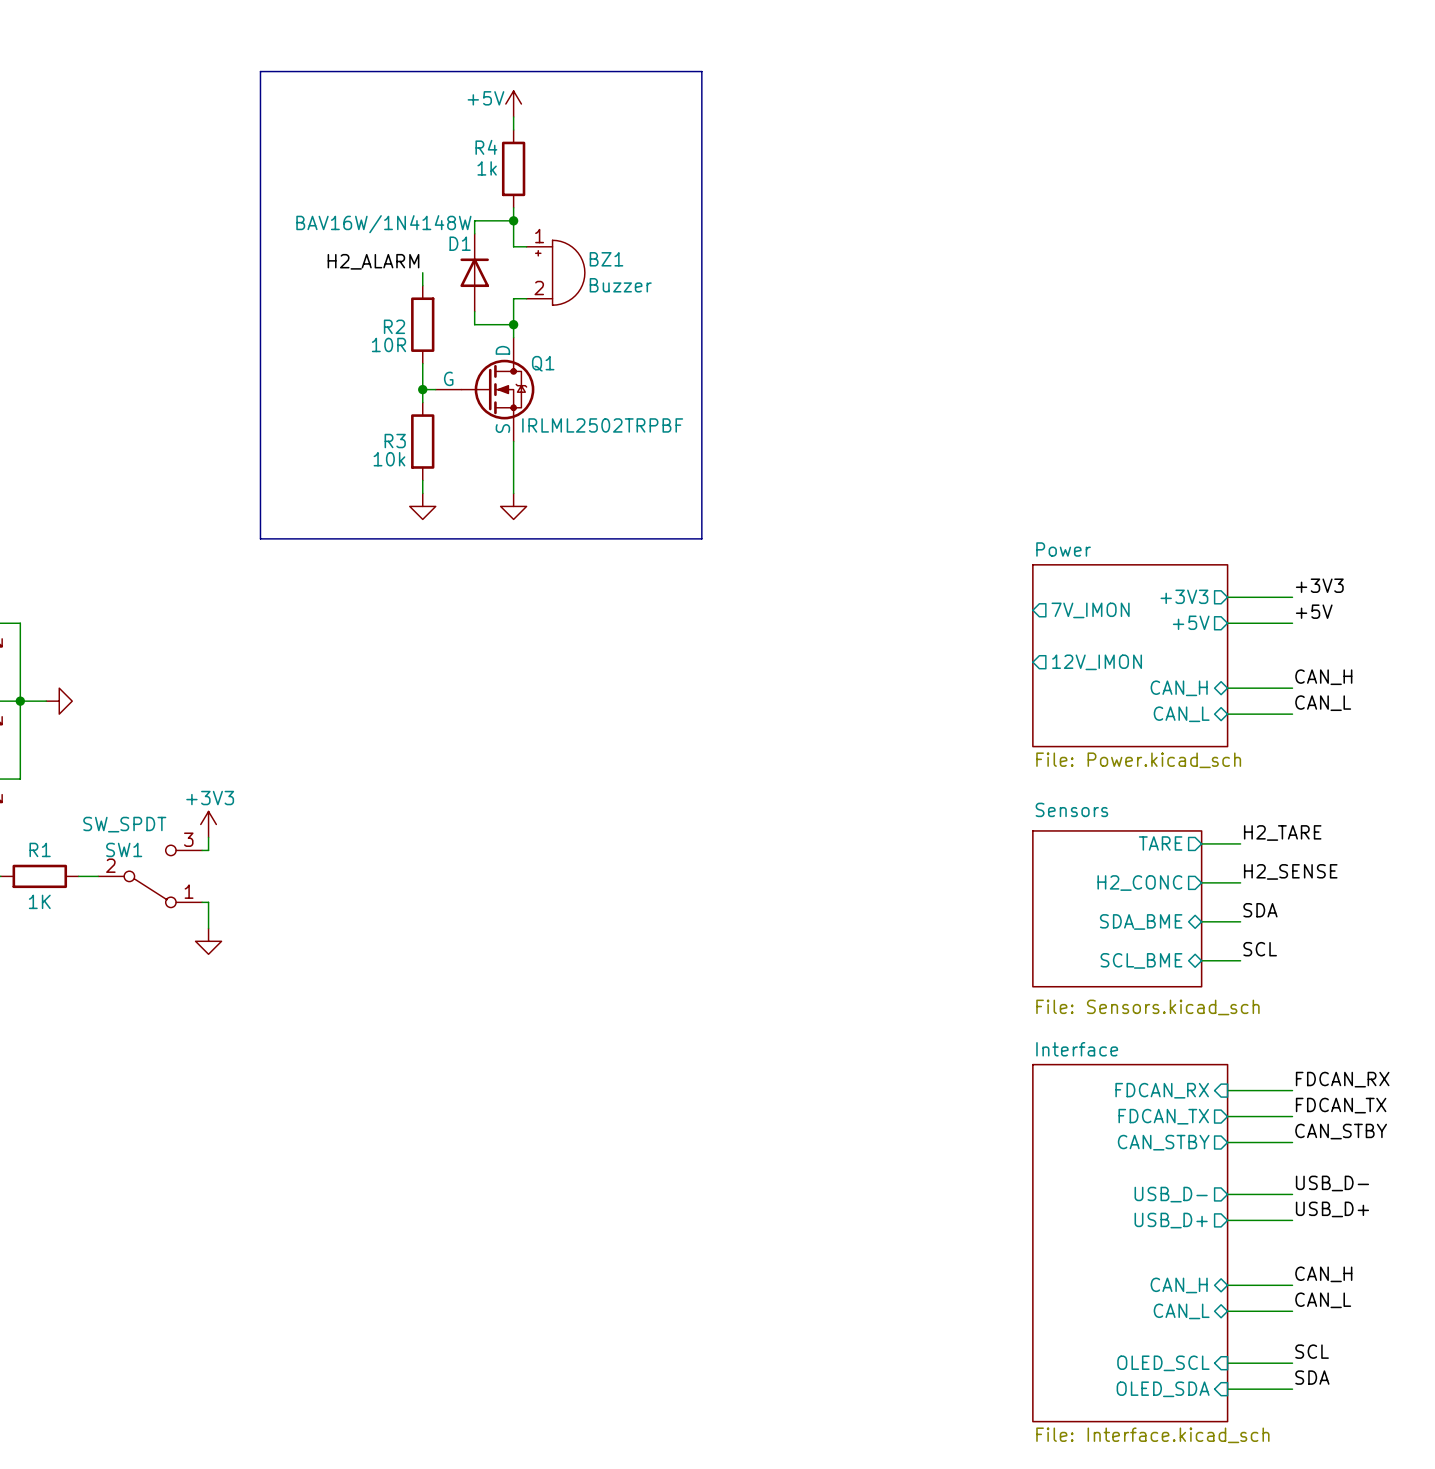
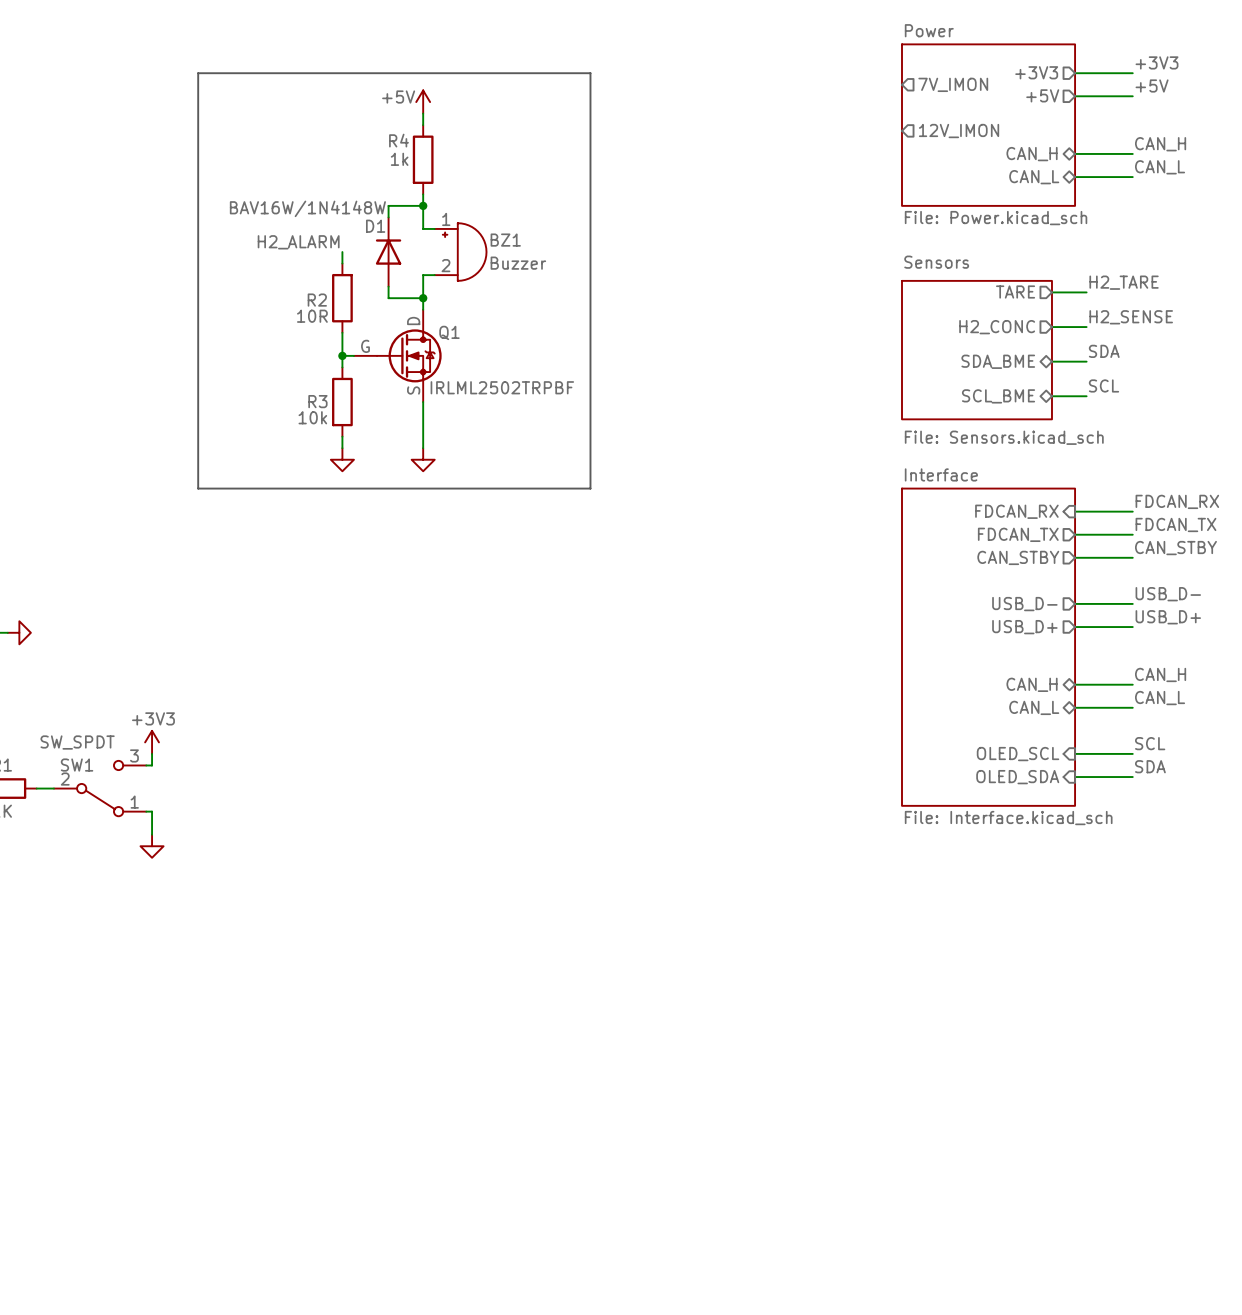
label: none -> +3V3 (1157, 62)
sheet pin: none -> +3V3 (1036, 72)
wire: none -> (1075, 73) (1132, 73)
sheet pin: none -> 7V_IMON (953, 84)
label: none -> +5V (1152, 85)
sheet pin: none -> +5V (1042, 95)
wire: none -> (1075, 96) (1132, 96)
sheet Power: none -> File: Power.kicad_sch (988, 125)
sheet pin: none -> 12V_IMON (959, 131)
label: none -> CAN_H (1160, 144)
sheet pin: none -> CAN_H (1032, 154)
wire: none -> (1075, 153) (1132, 153)
label: none -> CAN_L (1160, 167)
sheet pin: none -> CAN_L (1034, 177)
wire: none -> (1075, 177) (1132, 177)
label: none -> H2_TARE (1124, 282)
sheet pin: none -> TARE (1015, 292)
wire: none -> (1051, 292) (1086, 292)
label: none -> H2_SENSE (1131, 317)
sheet pin: none -> H2_CONC (997, 327)
wire: none -> (1051, 327) (1086, 327)
sheet Sensors: none -> File: Sensors.kicad_sch (976, 350)
label: none -> SDA (1104, 351)
sheet pin: none -> SDA_BME (998, 361)
wire: none -> (1051, 361) (1086, 361)
label: none -> SCL (1103, 385)
sheet pin: none -> SCL_BME (998, 396)
wire: none -> (1051, 396) (1086, 396)
label: none -> FDCAN_RX (1177, 501)
sheet pin: none -> FDCAN_RX (1016, 511)
wire: none -> (1075, 511) (1132, 511)
label: none -> FDCAN_TX (1175, 524)
label: +3V3 (1319, 585) -> none
sheet pin: none -> FDCAN_TX (1018, 534)
wire: none -> (1075, 534) (1132, 534)
sheet pin: +3V3 (1184, 596) -> none
wire: (1227, 597) (1292, 597) -> (1075, 603) (1132, 603)
label: none -> CAN_STBY (1175, 548)
sheet pin: 7V_IMON (1090, 610) -> none
label: +5V (1314, 611) -> none
sheet pin: none -> CAN_STBY (1018, 557)
wire: none -> (1075, 557) (1132, 557)
sheet pin: +5V (1191, 622) -> none
wire: (1227, 623) (1292, 623) -> (1075, 627) (1132, 627)
sheet Power: File: Power.kicad_sch (1130, 655) -> none
label: none -> USB_D- (1168, 594)
sheet pin: 12V_IMON (1097, 662) -> none
sheet pin: none -> USB_D- (1024, 604)
label position: CAN_H (1323, 677) -> CAN_H (1160, 674)
label: none -> USB_D+ (1168, 617)
sheet pin position: CAN_H (1179, 688) -> CAN_H (1032, 684)
wire: (1227, 688) (1292, 688) -> (1075, 684) (1132, 684)
sheet pin: none -> USB_D+ (1024, 627)
label position: CAN_L (1323, 703) -> CAN_L (1160, 698)
sheet pin position: CAN_L (1181, 714) -> CAN_L (1034, 707)
wire: (1227, 714) (1292, 714) -> (1075, 707) (1132, 707)
sheet Interface: none -> File: Interface.kicad_sch (988, 647)
label: H2_TARE (1282, 832) -> none
sheet pin: none -> OLED_SCL (1018, 754)
sheet pin: TARE (1160, 843) -> none
wire: (1201, 843) (1240, 843) -> none
sheet pin: none -> OLED_SDA (1017, 777)
label: H2_SENSE (1290, 871) -> none
wire: (1201, 882) (1240, 882) -> none
sheet pin: H2_CONC (1139, 883) -> none
sheet Sensors: File: Sensors.kicad_sch (1117, 908) -> none
label position: SDA (1260, 910) -> SDA (1150, 766)
sheet pin: SDA_BME (1141, 921) -> none
wire: (1201, 921) (1240, 921) -> none
label position: SCL (1260, 949) -> SCL (1150, 743)
sheet pin: SCL_BME (1141, 960) -> none
wire: (1201, 960) (1240, 960) -> none
label: FDCAN_RX (1342, 1079) -> none
sheet pin: FDCAN_RX (1162, 1090) -> none
wire: (1227, 1090) (1292, 1090) -> (1075, 753) (1132, 753)
label: FDCAN_TX (1341, 1105) -> none
sheet pin: FDCAN_TX (1163, 1116) -> none
wire: (1227, 1116) (1292, 1116) -> (1075, 777) (1132, 777)
label: CAN_STBY (1341, 1131) -> none
sheet pin: CAN_STBY (1163, 1142) -> none
wire: (1227, 1142) (1292, 1142) -> none
label: USB_D- (1332, 1183) -> none
sheet pin: USB_D- (1171, 1194) -> none
wire: (1227, 1194) (1292, 1194) -> none
label: USB_D+ (1332, 1209) -> none
sheet pin: USB_D+ (1171, 1220) -> none
wire: (1227, 1220) (1292, 1220) -> none
sheet Interface: File: Interface.kicad_sch (1130, 1243) -> none
label: CAN_H (1323, 1274) -> none
sheet pin: CAN_H (1179, 1285) -> none
wire: (1227, 1285) (1292, 1285) -> none
label: CAN_L (1323, 1300) -> none
sheet pin: CAN_L (1181, 1311) -> none
wire: (1227, 1311) (1292, 1311) -> none
label: SCL (1312, 1351) -> none
sheet pin: OLED_SCL (1163, 1363) -> none
wire: (1227, 1363) (1292, 1363) -> none
label: SDA (1312, 1377) -> none
sheet pin: OLED_SDA (1163, 1389) -> none
wire: (1227, 1389) (1292, 1389) -> none

